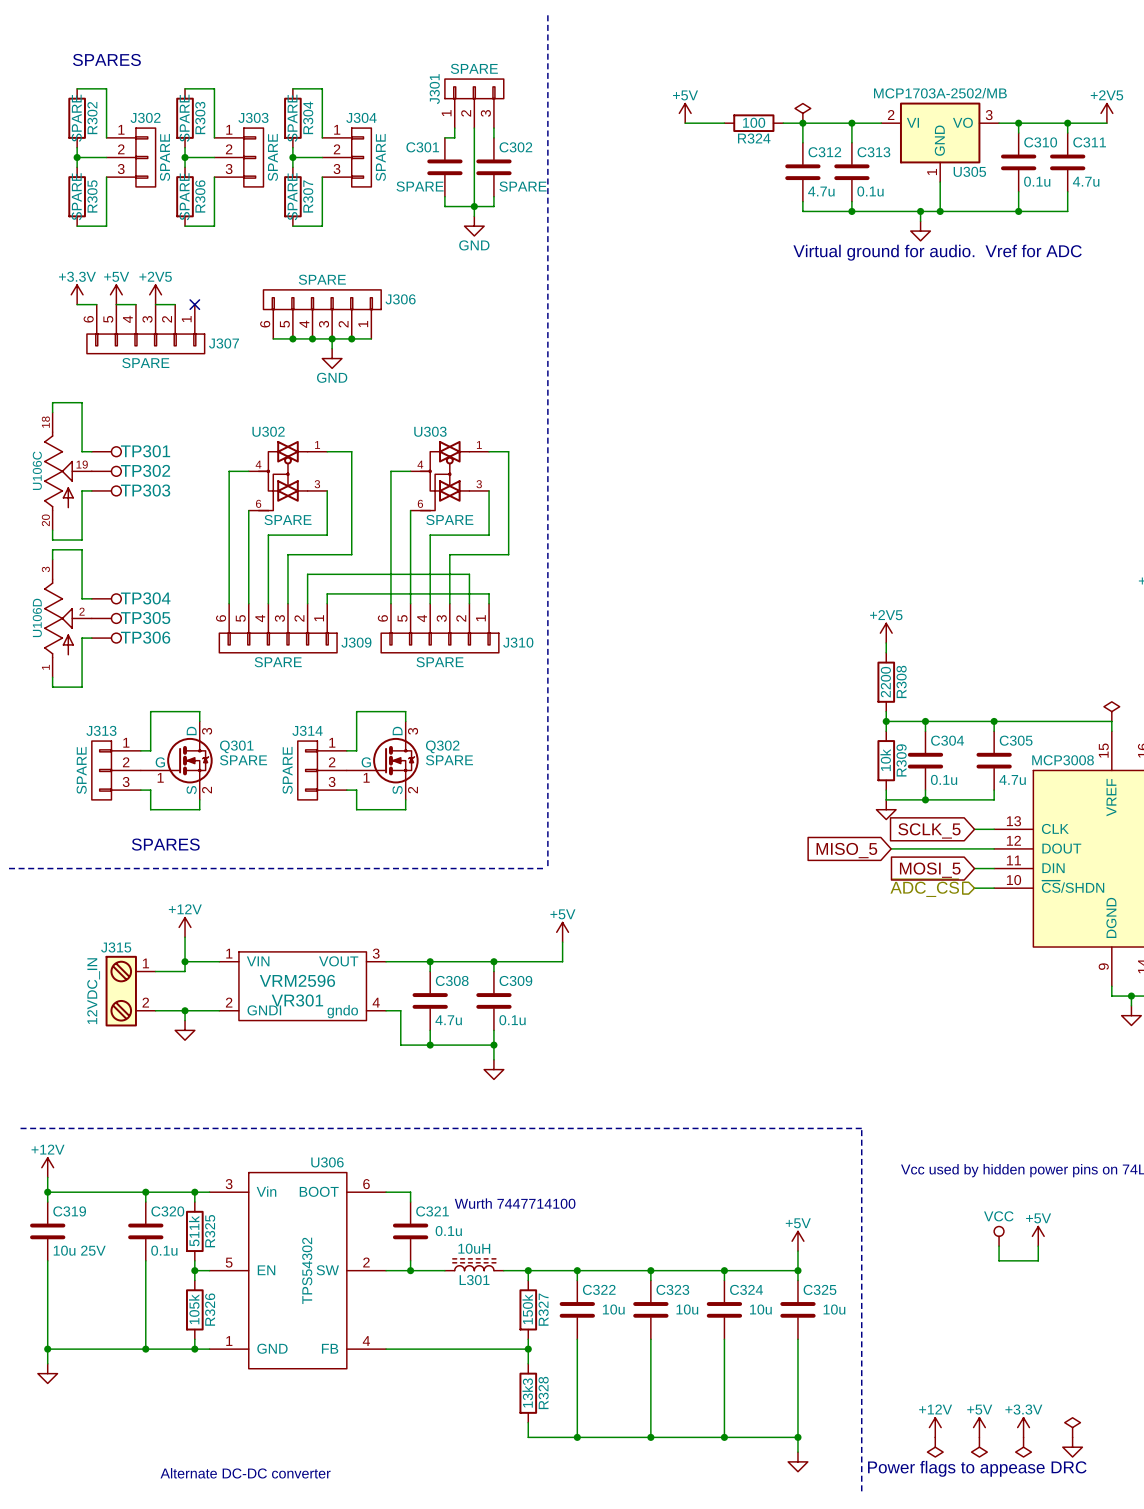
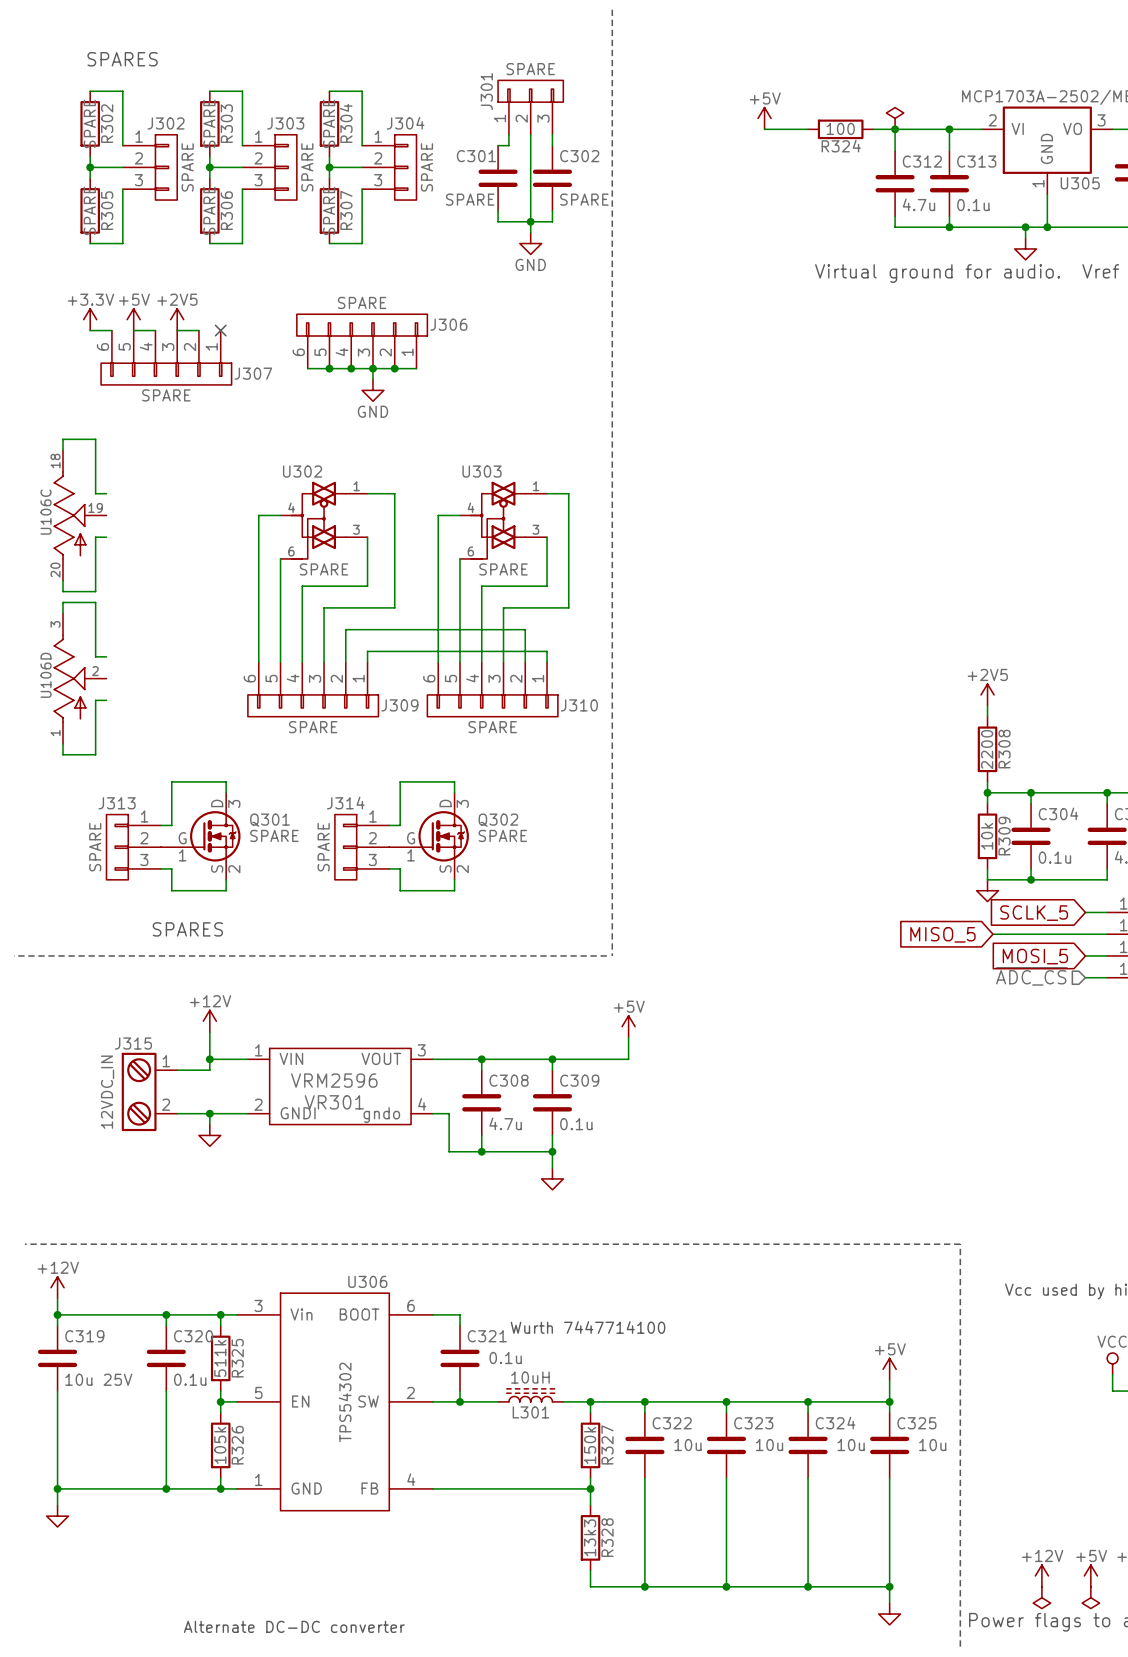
TP301: (106, 451) -> none
TP302: (106, 471) -> none
TP303: (106, 490) -> none
TP304: (106, 598) -> none
TP305: (106, 618) -> none
TP306: (106, 638) -> none

